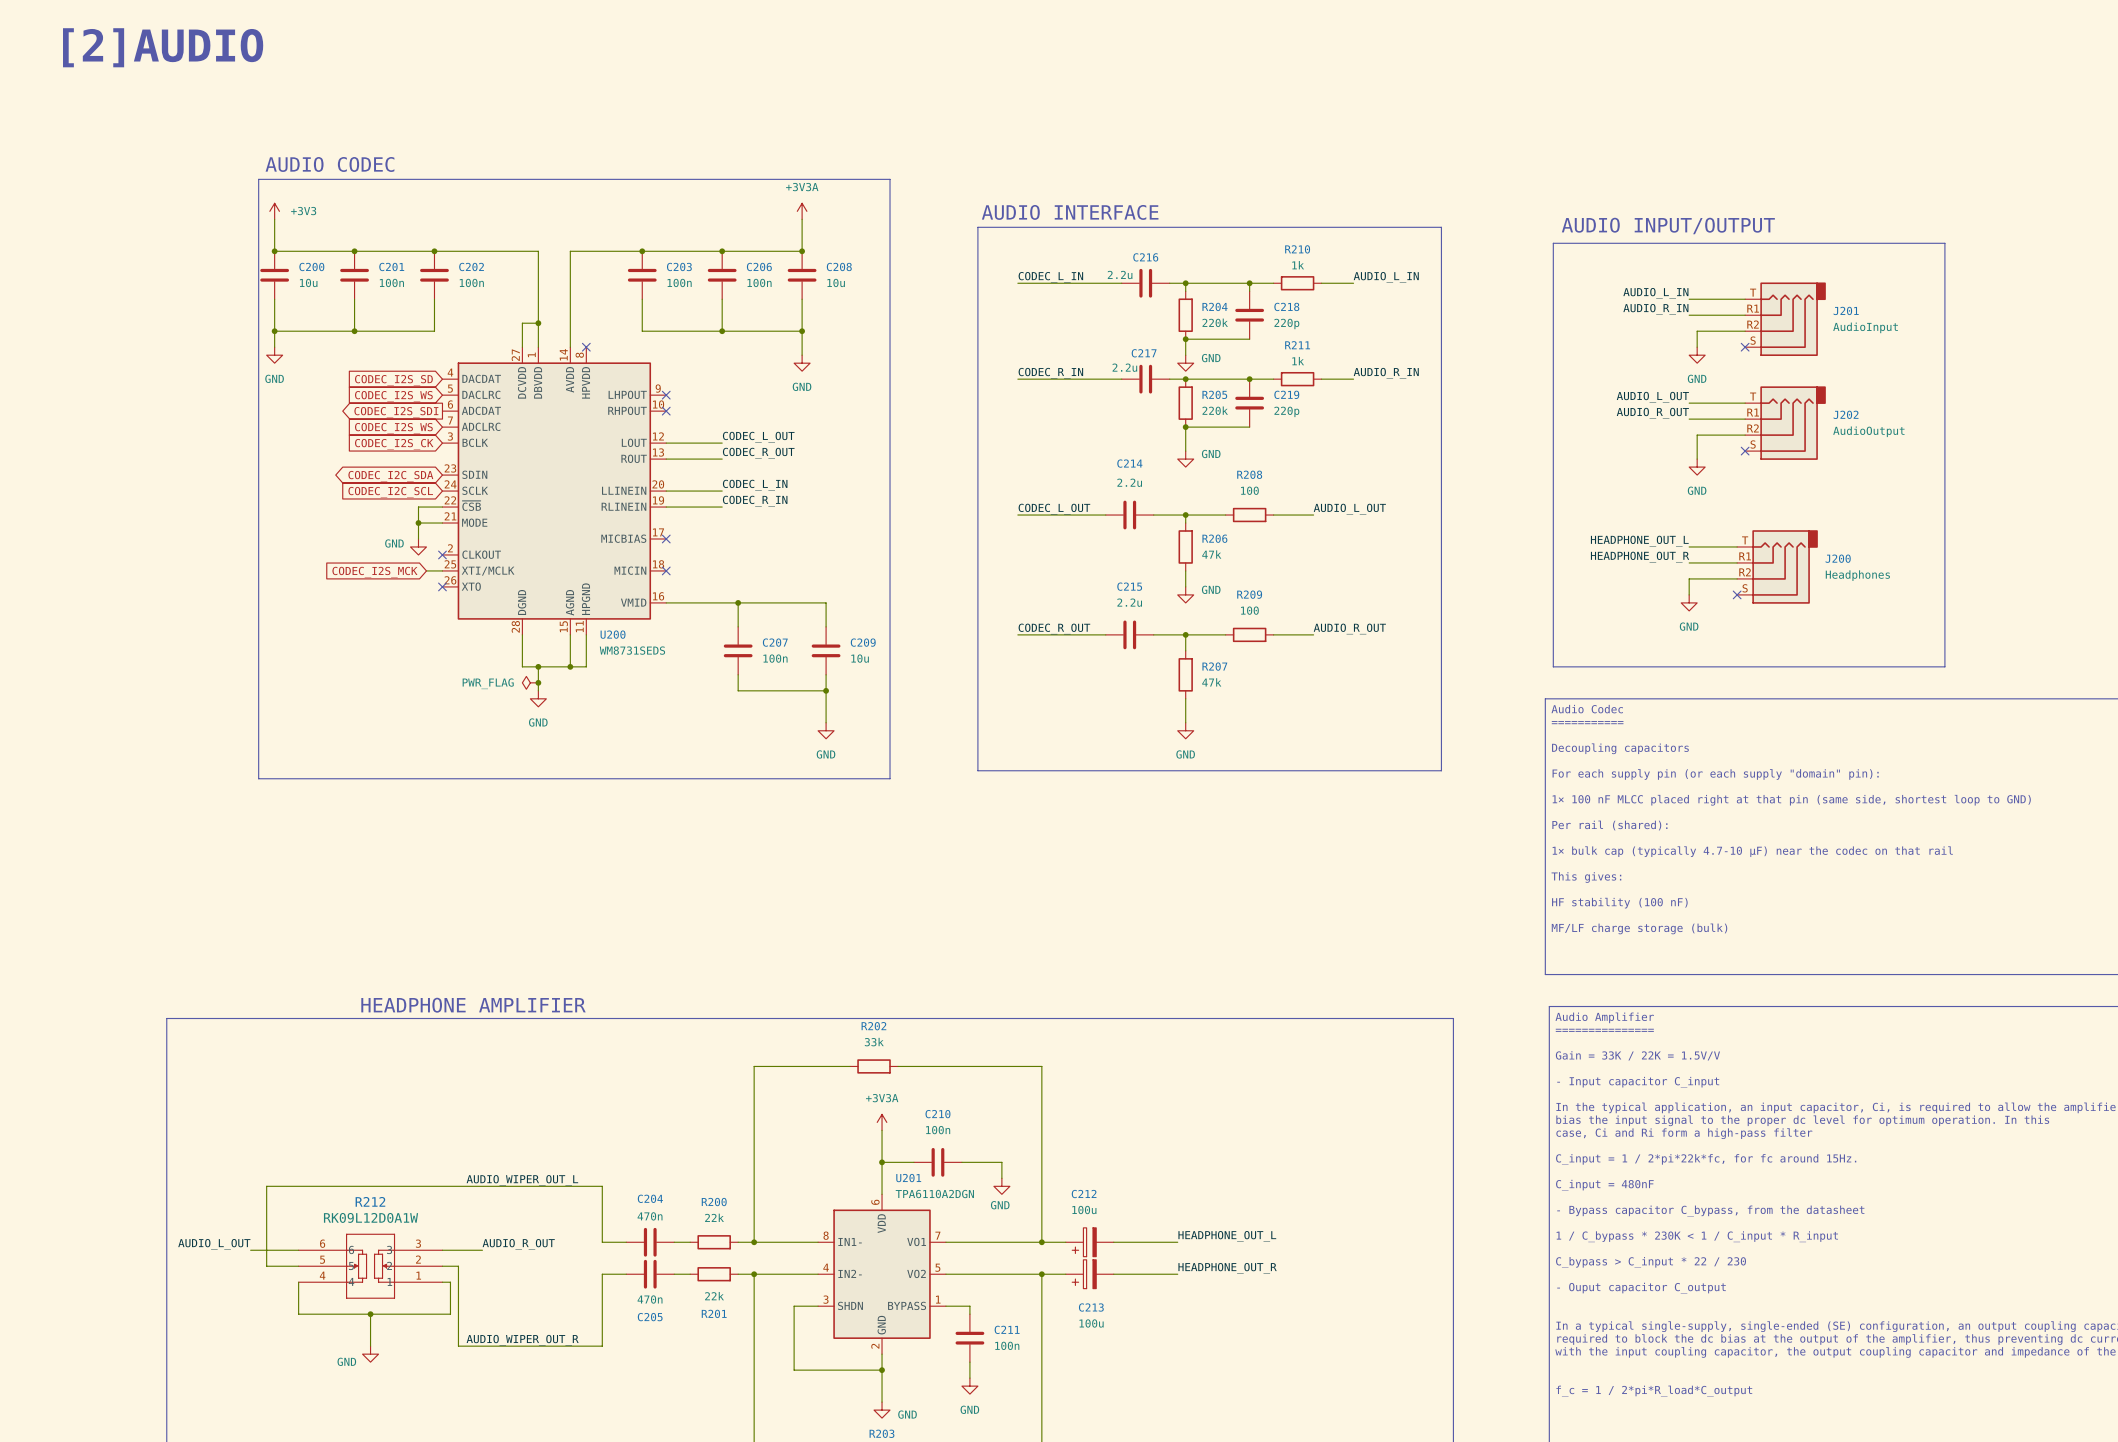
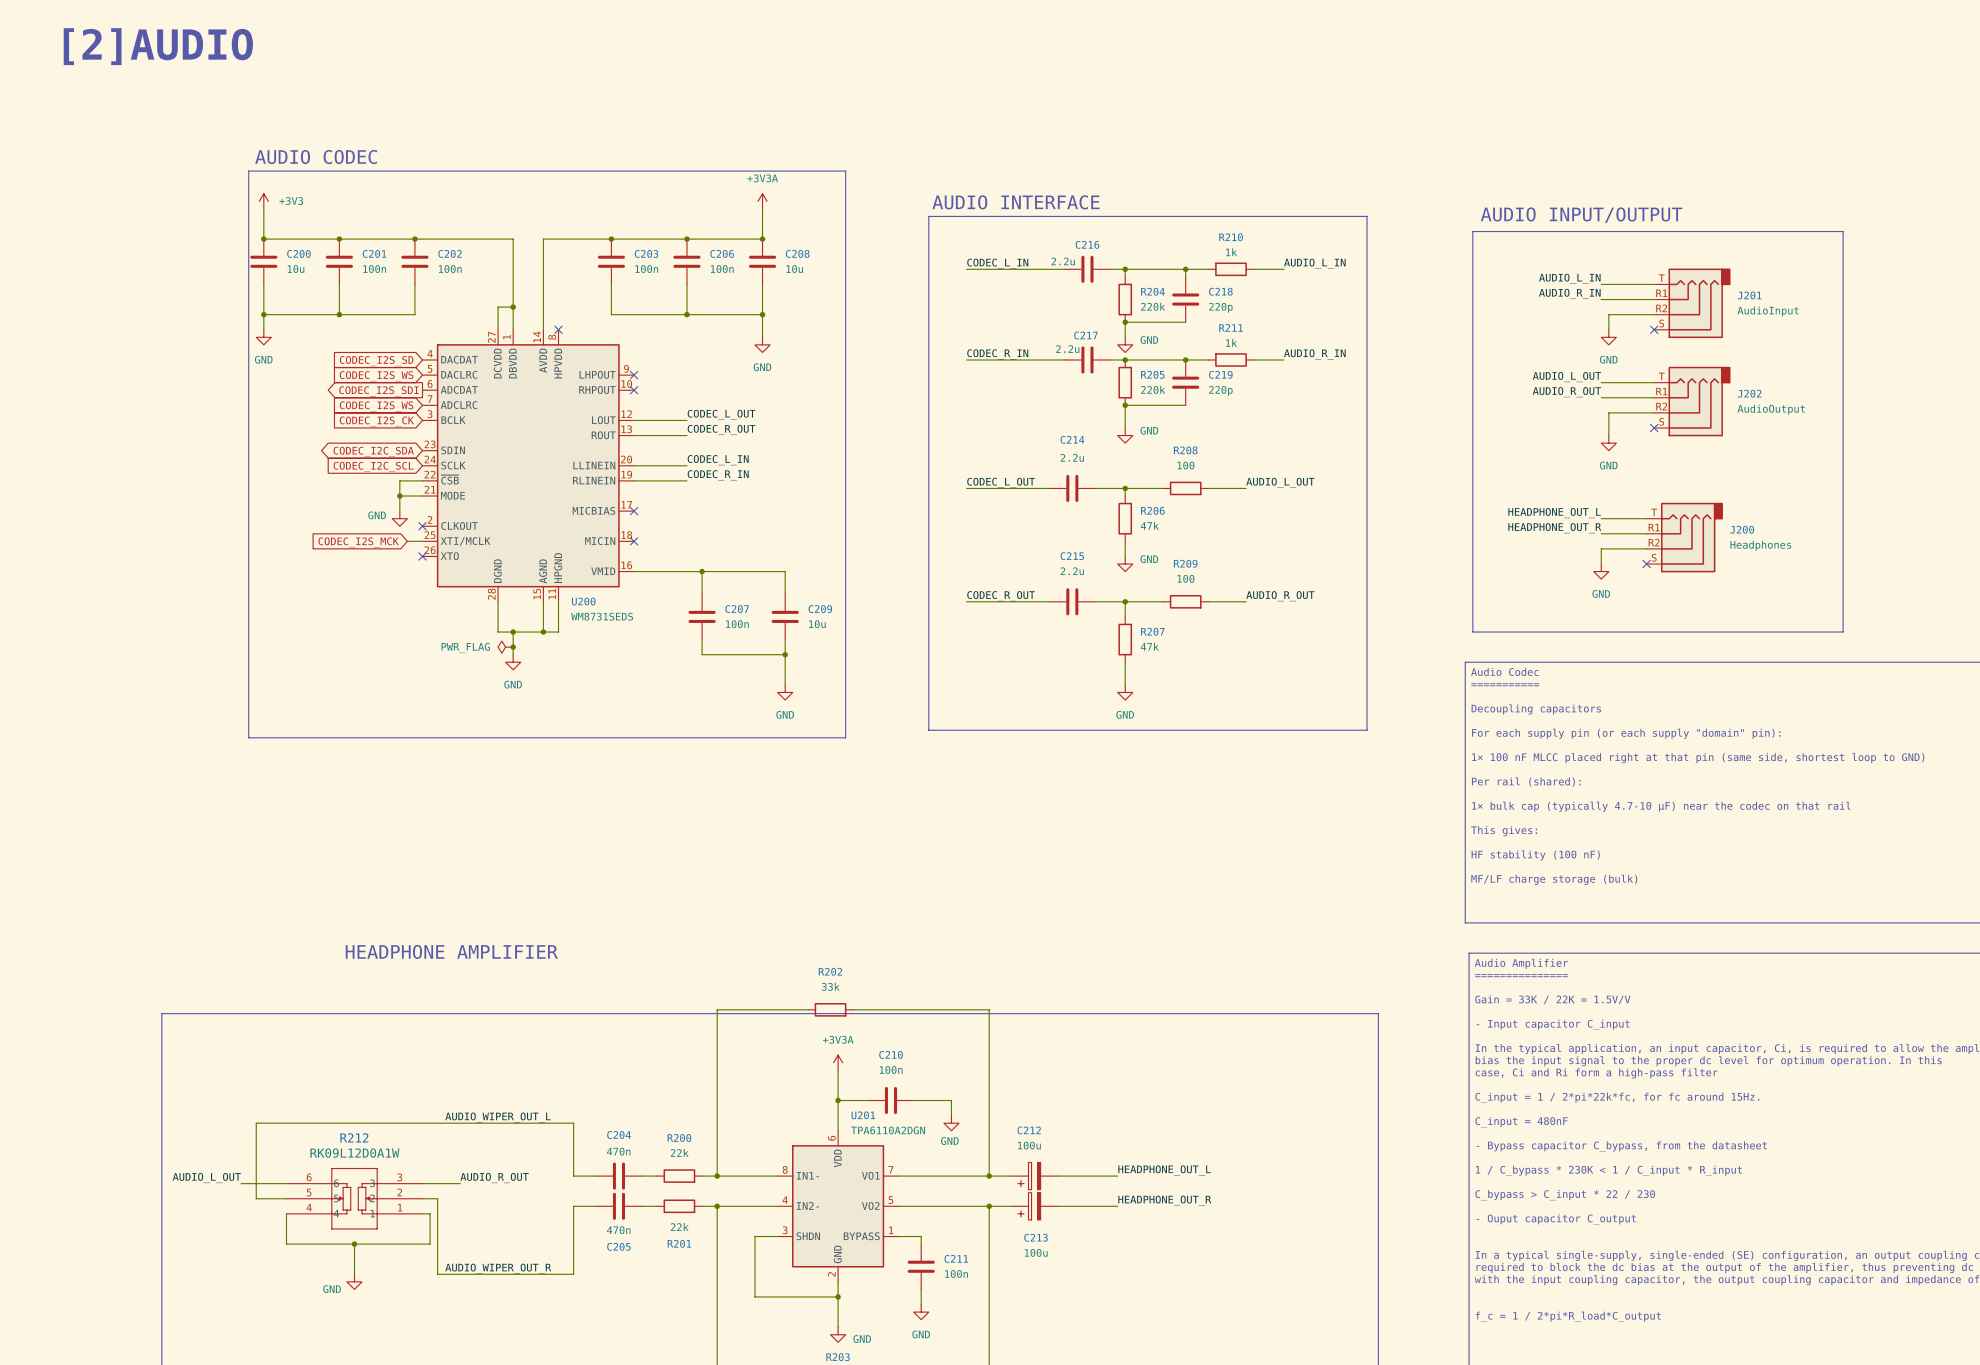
line: (166, 1070) (166, 1018) (1453, 1018) (1453, 1070) -> (161, 1013) (1378, 1013)

